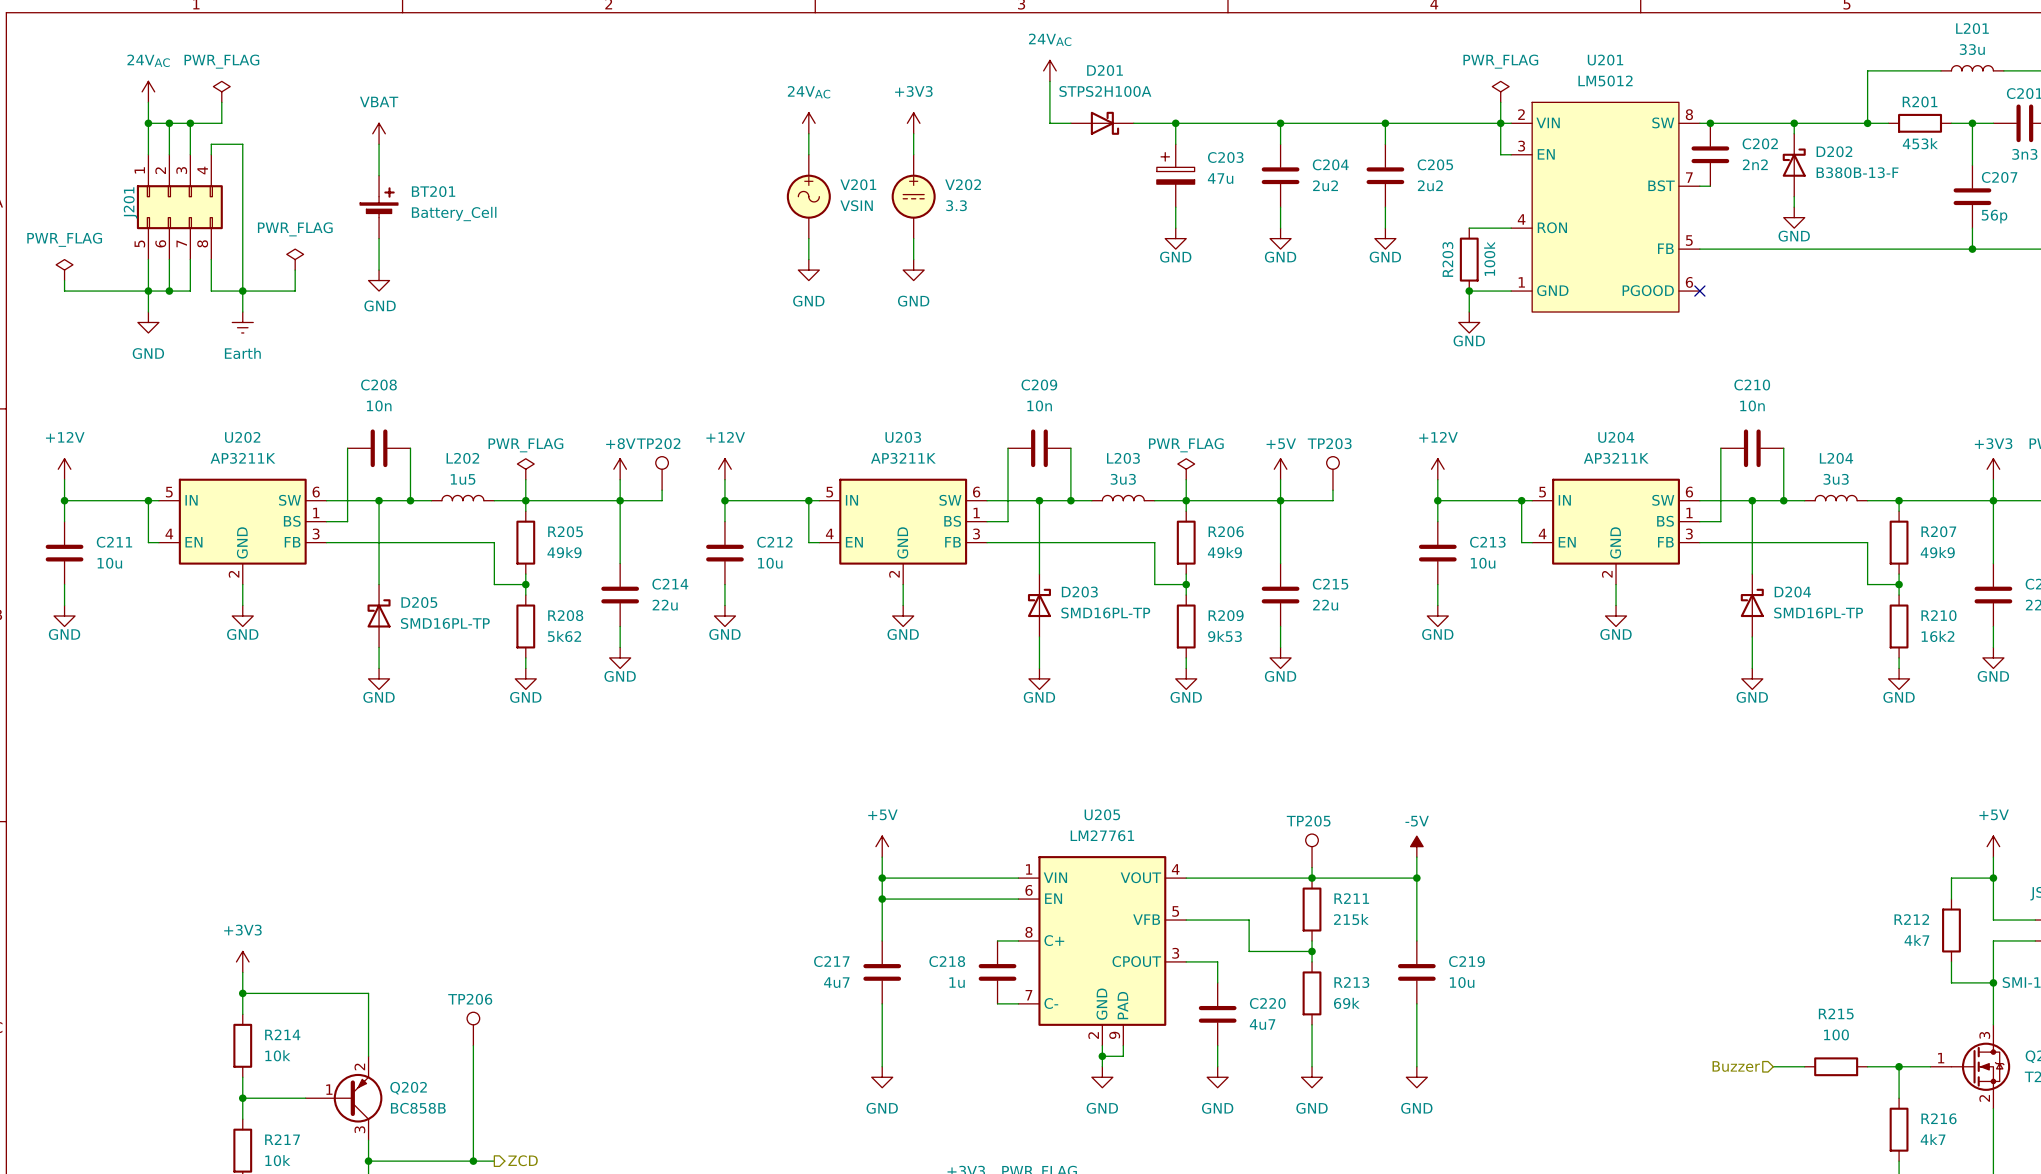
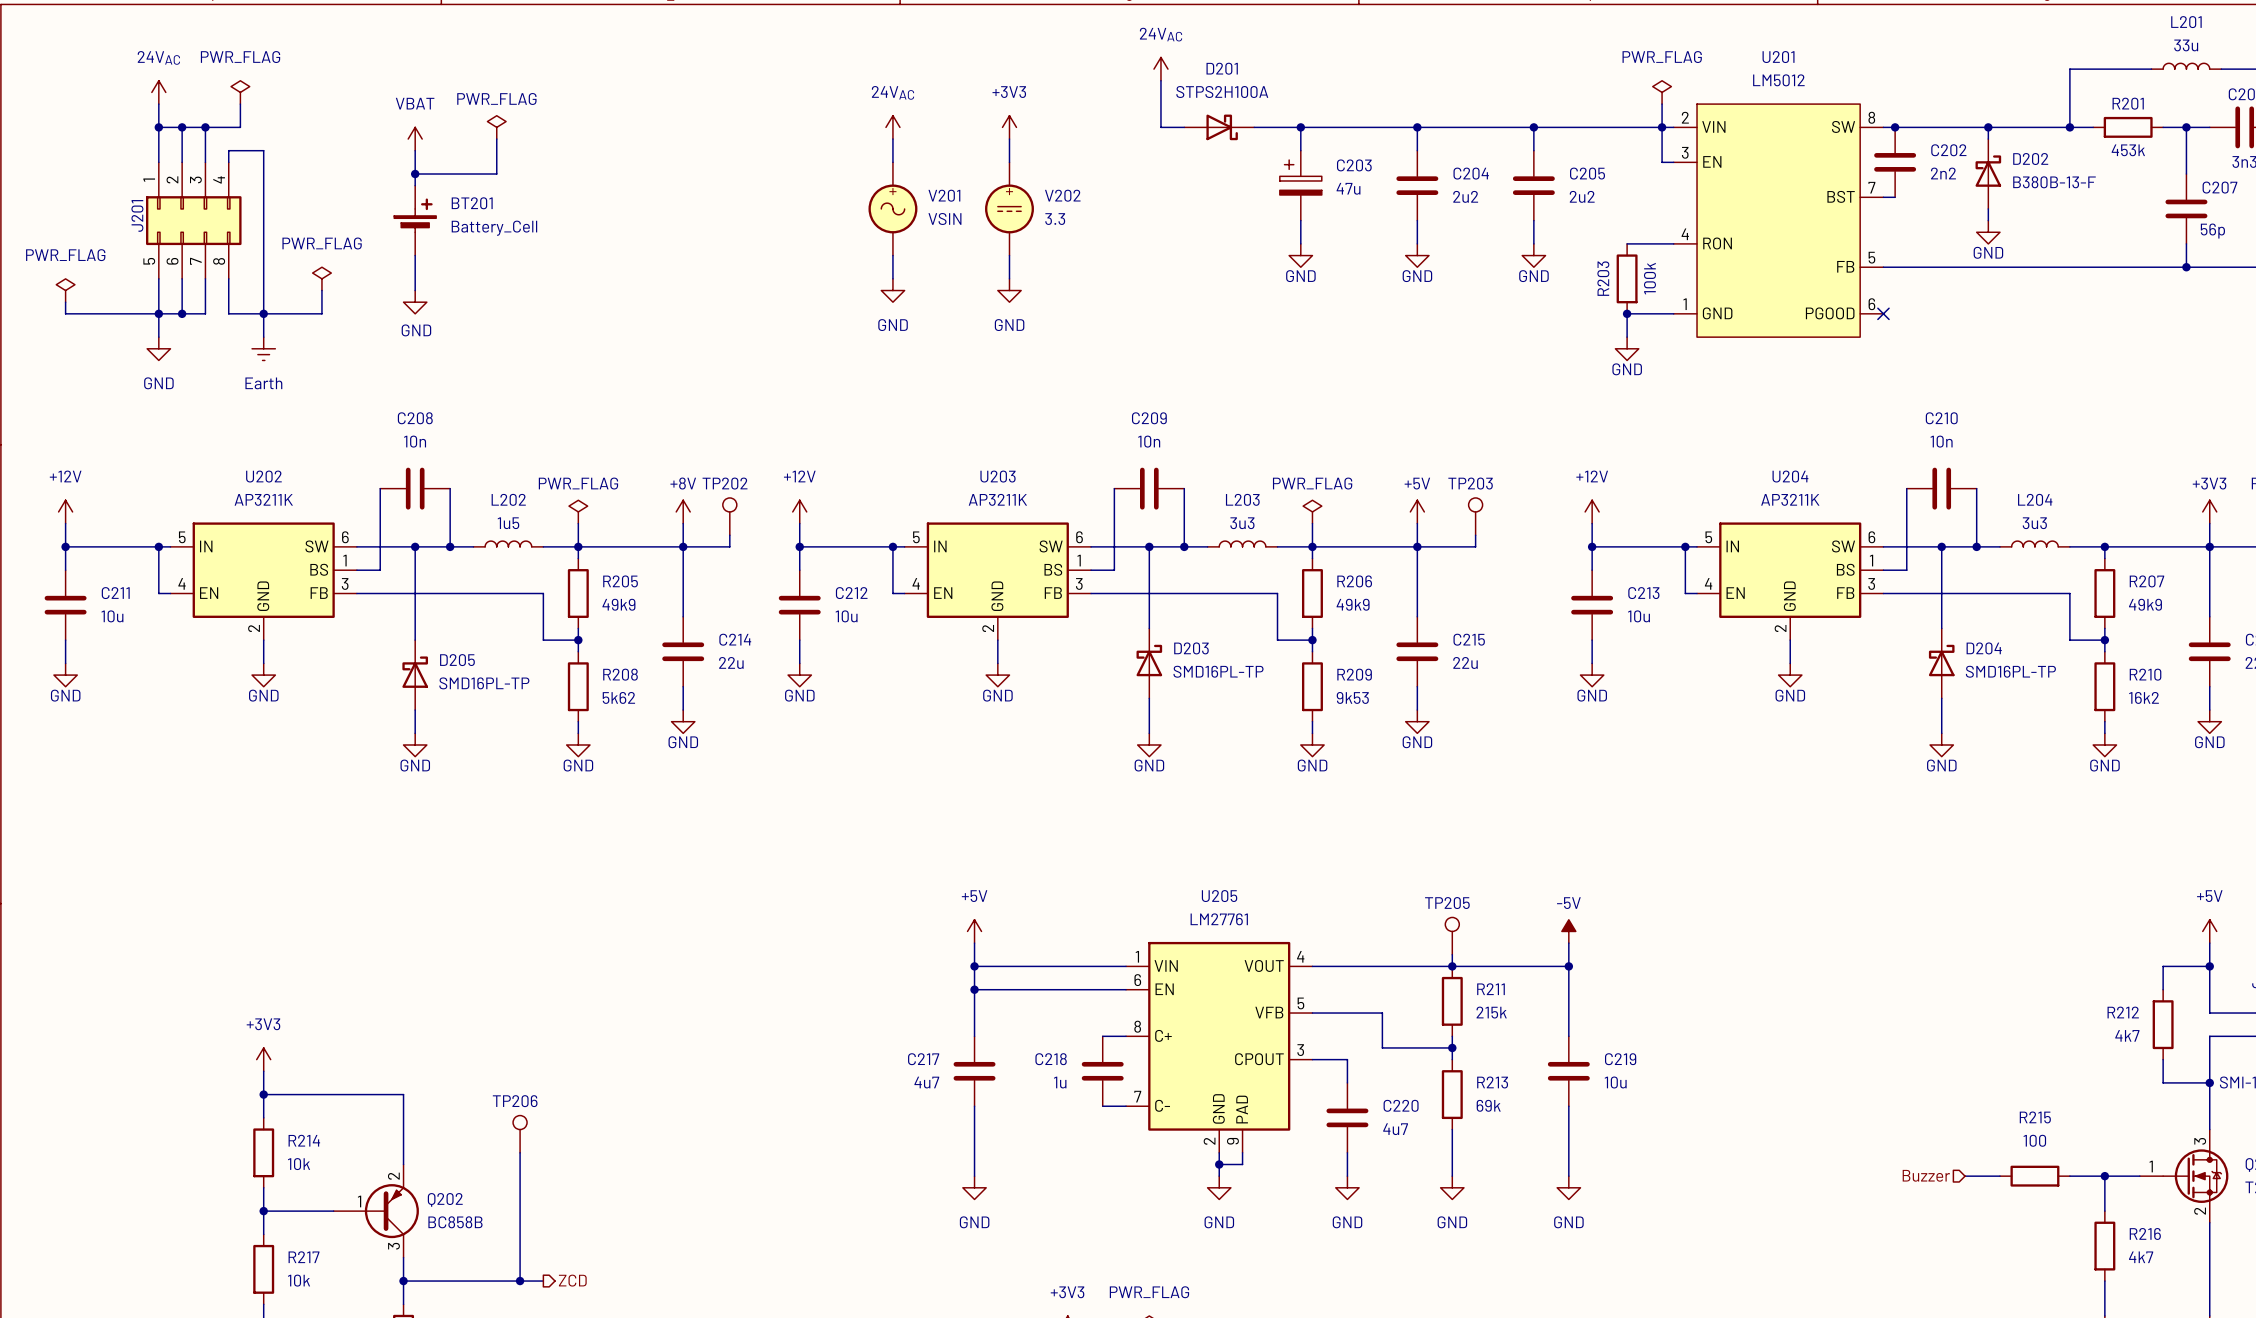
power symbol: none -> PWR_FLAG (496, 127)
wire: none -> (496, 139) (496, 174) (415, 174)
junction: none -> (415, 174)

